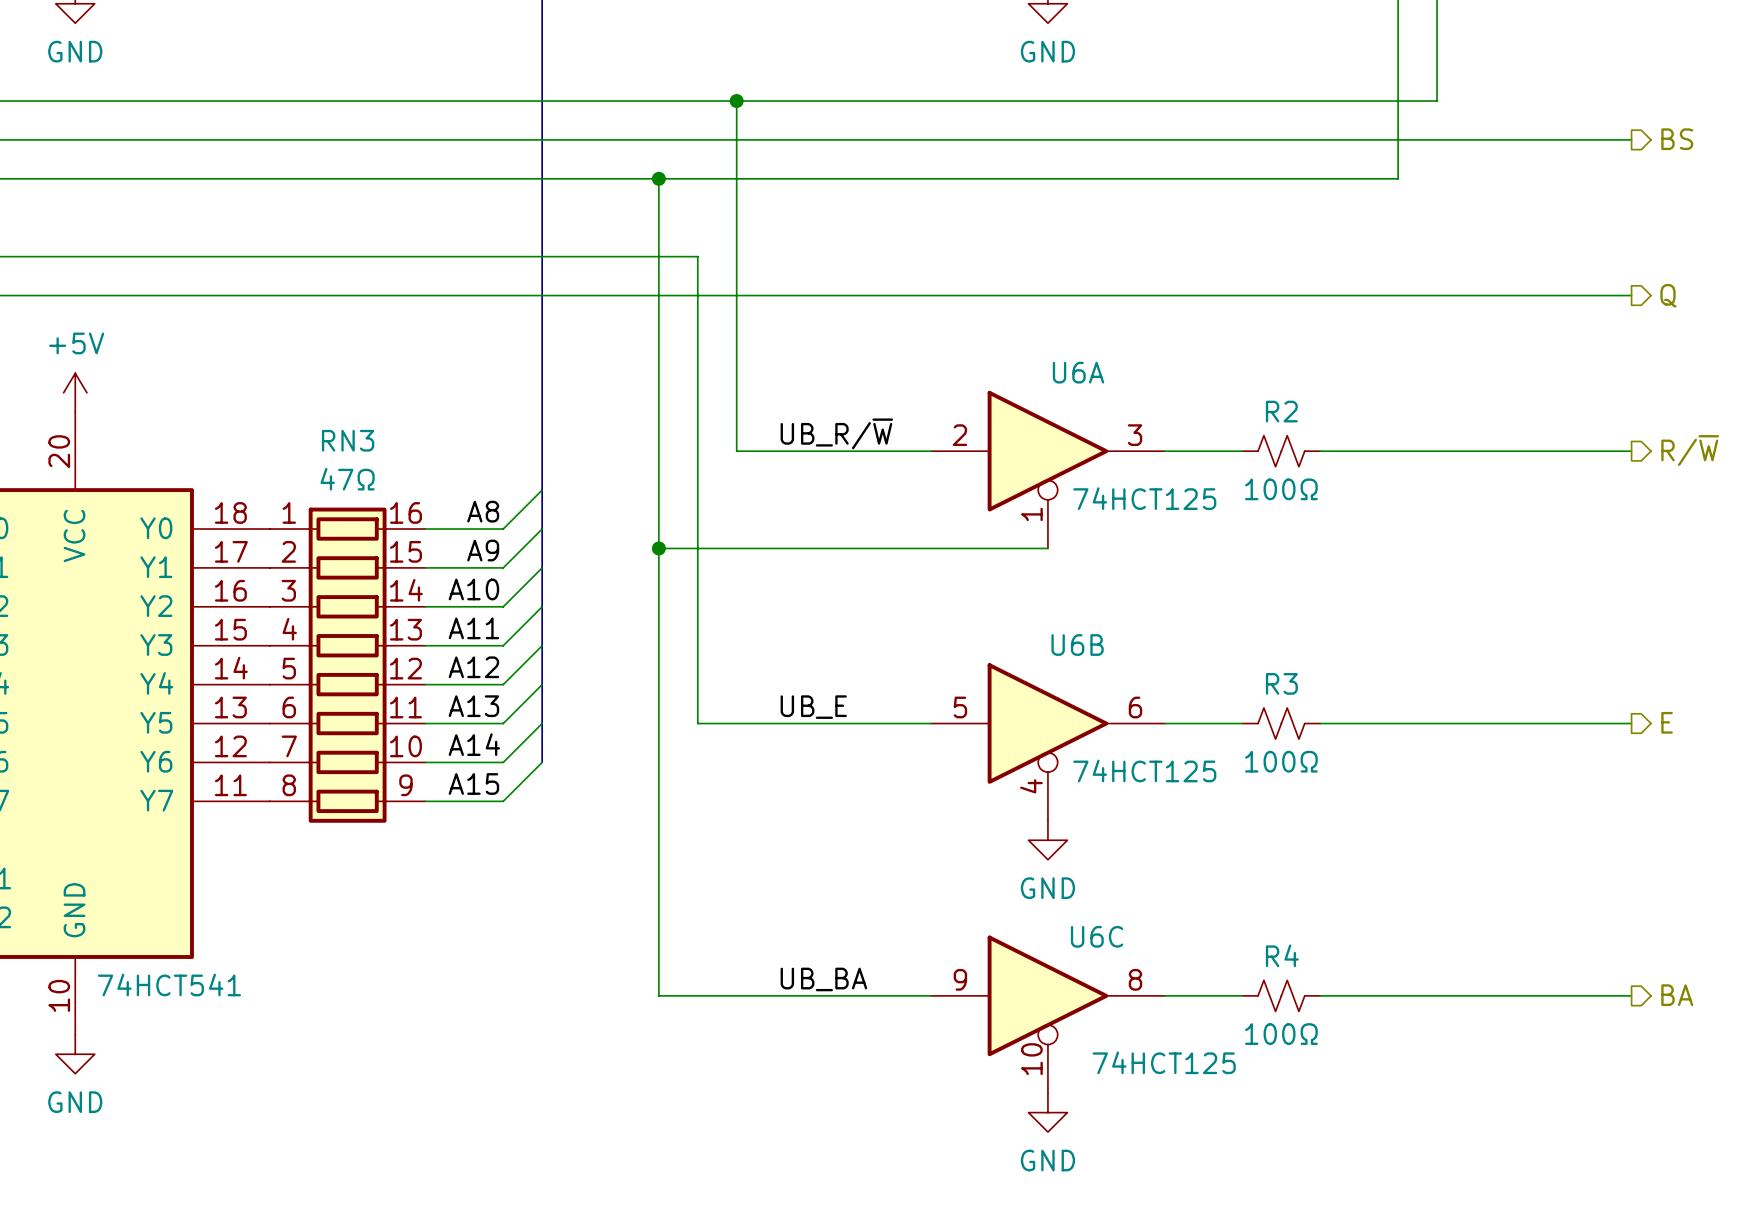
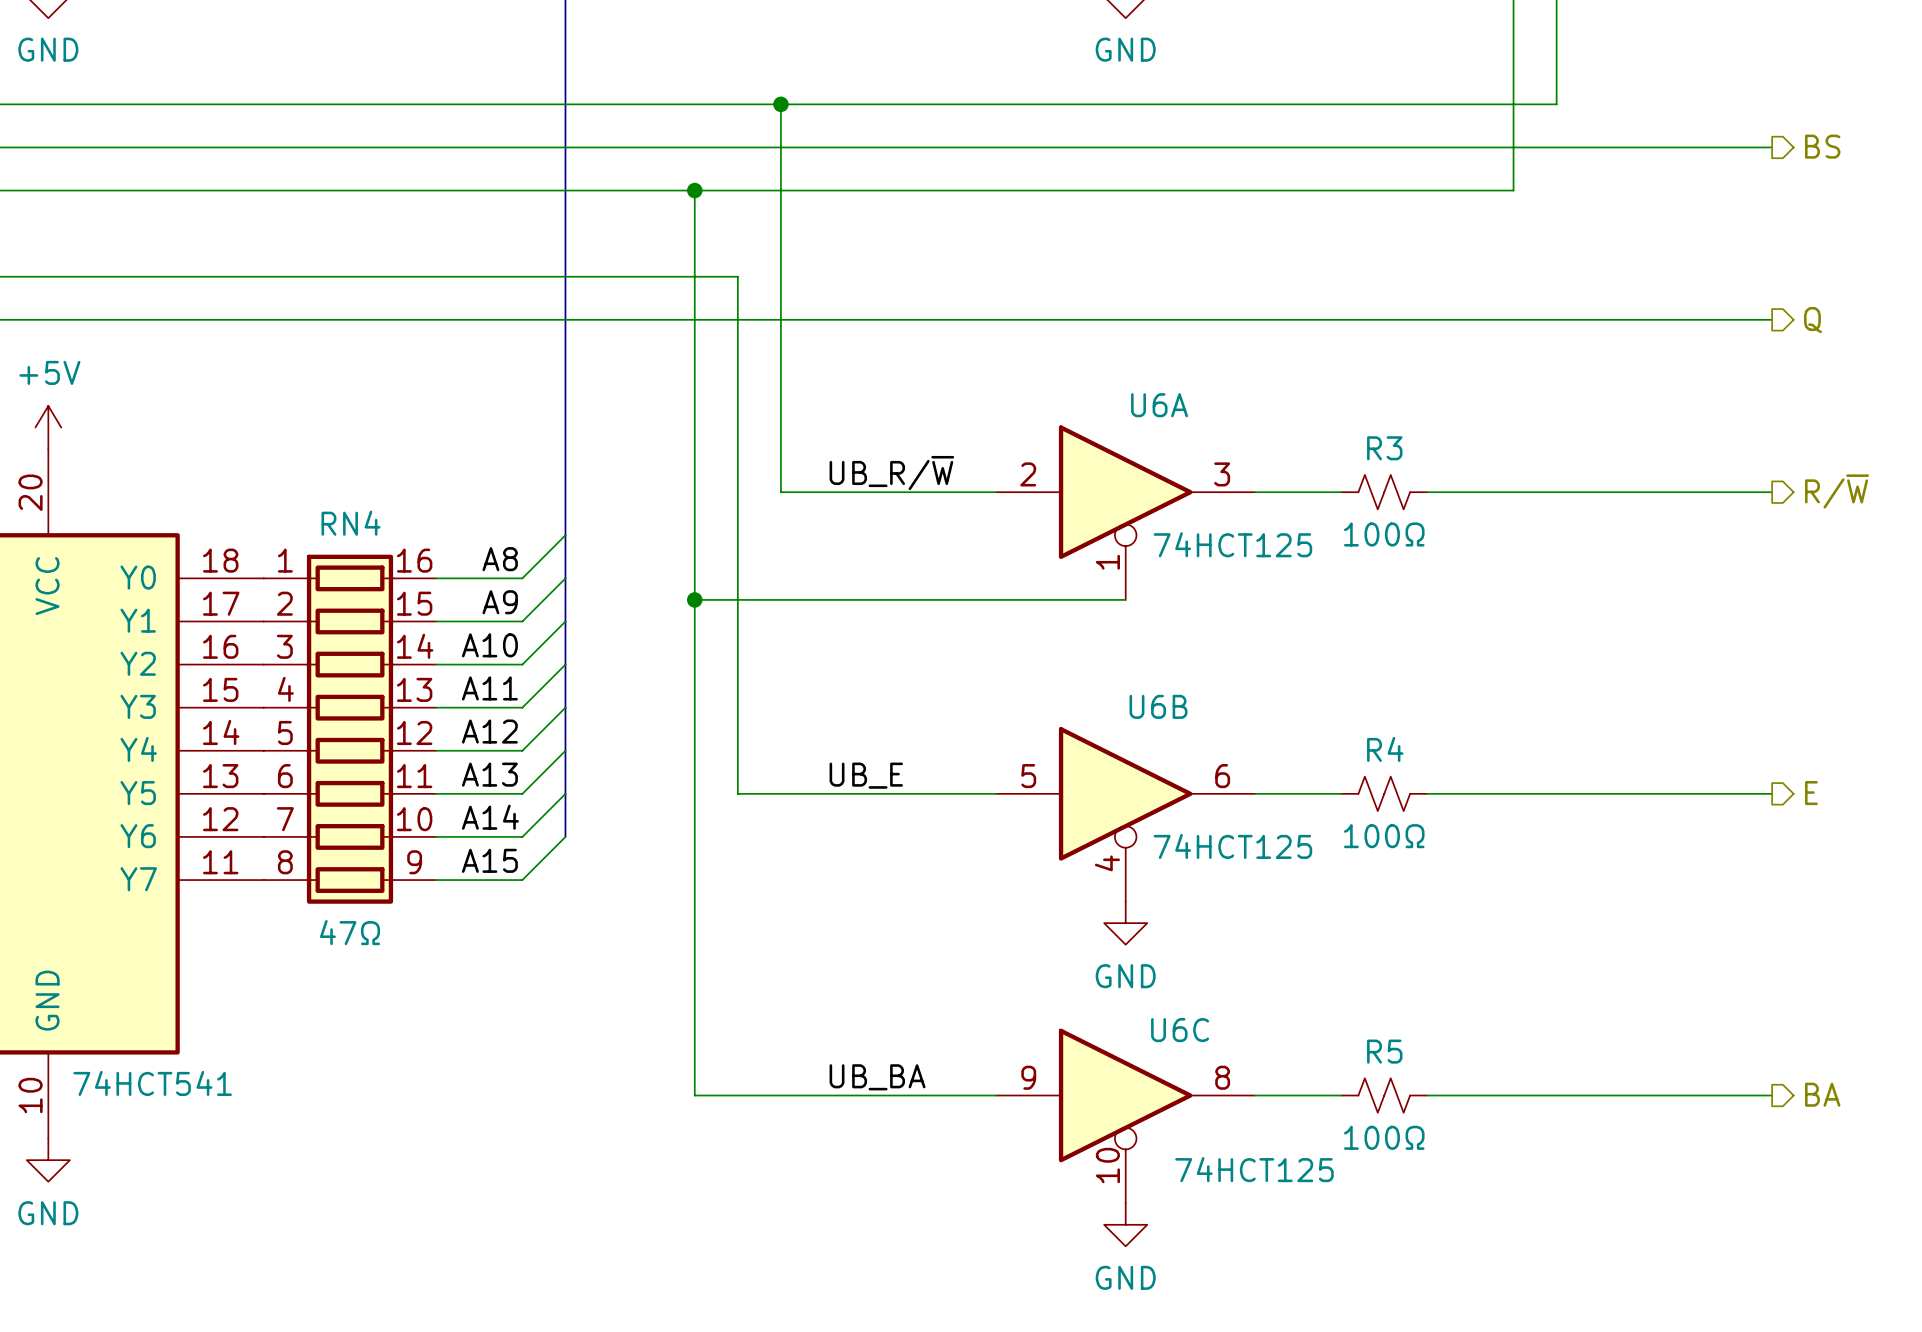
R2 name: R2 (1281, 411) -> R3 (1384, 448)
RN3 name: RN3 (348, 440) -> RN4 (351, 523)
RN3 value position: 47Ω (347, 479) -> 47Ω (350, 932)
R3 name: R3 (1281, 683) -> R4 (1385, 749)
R4 name: R4 (1282, 955) -> R5 (1384, 1051)

